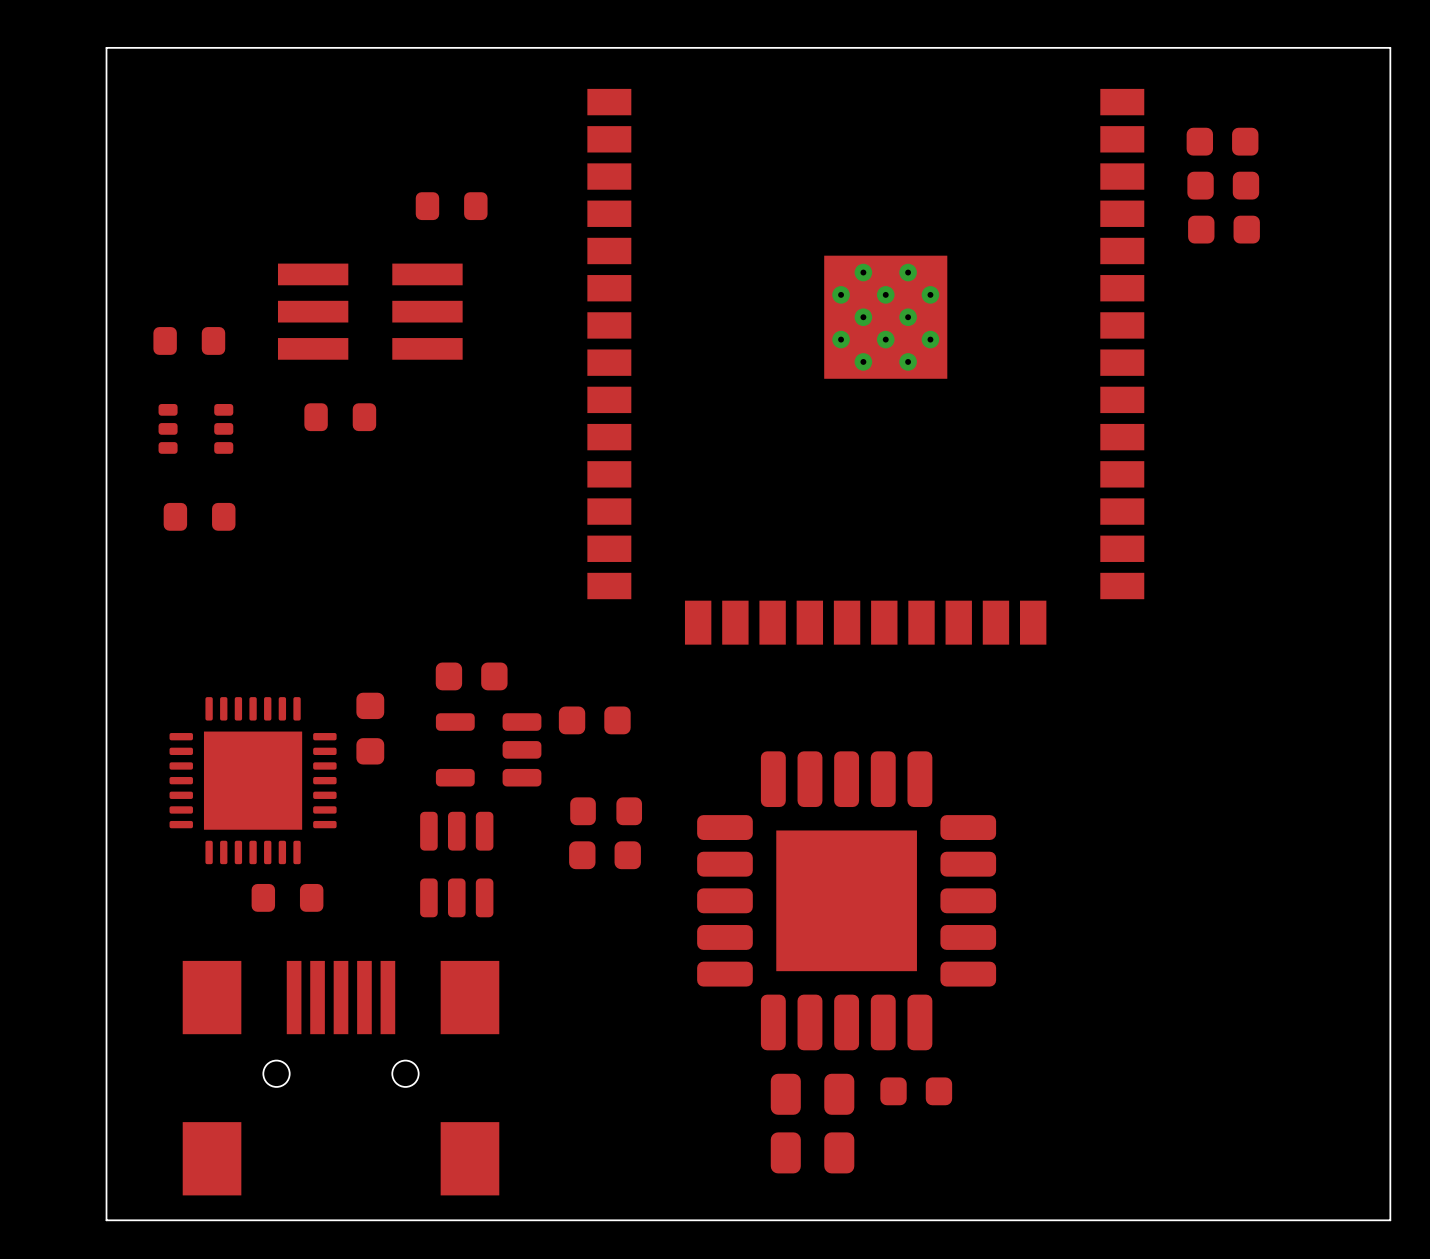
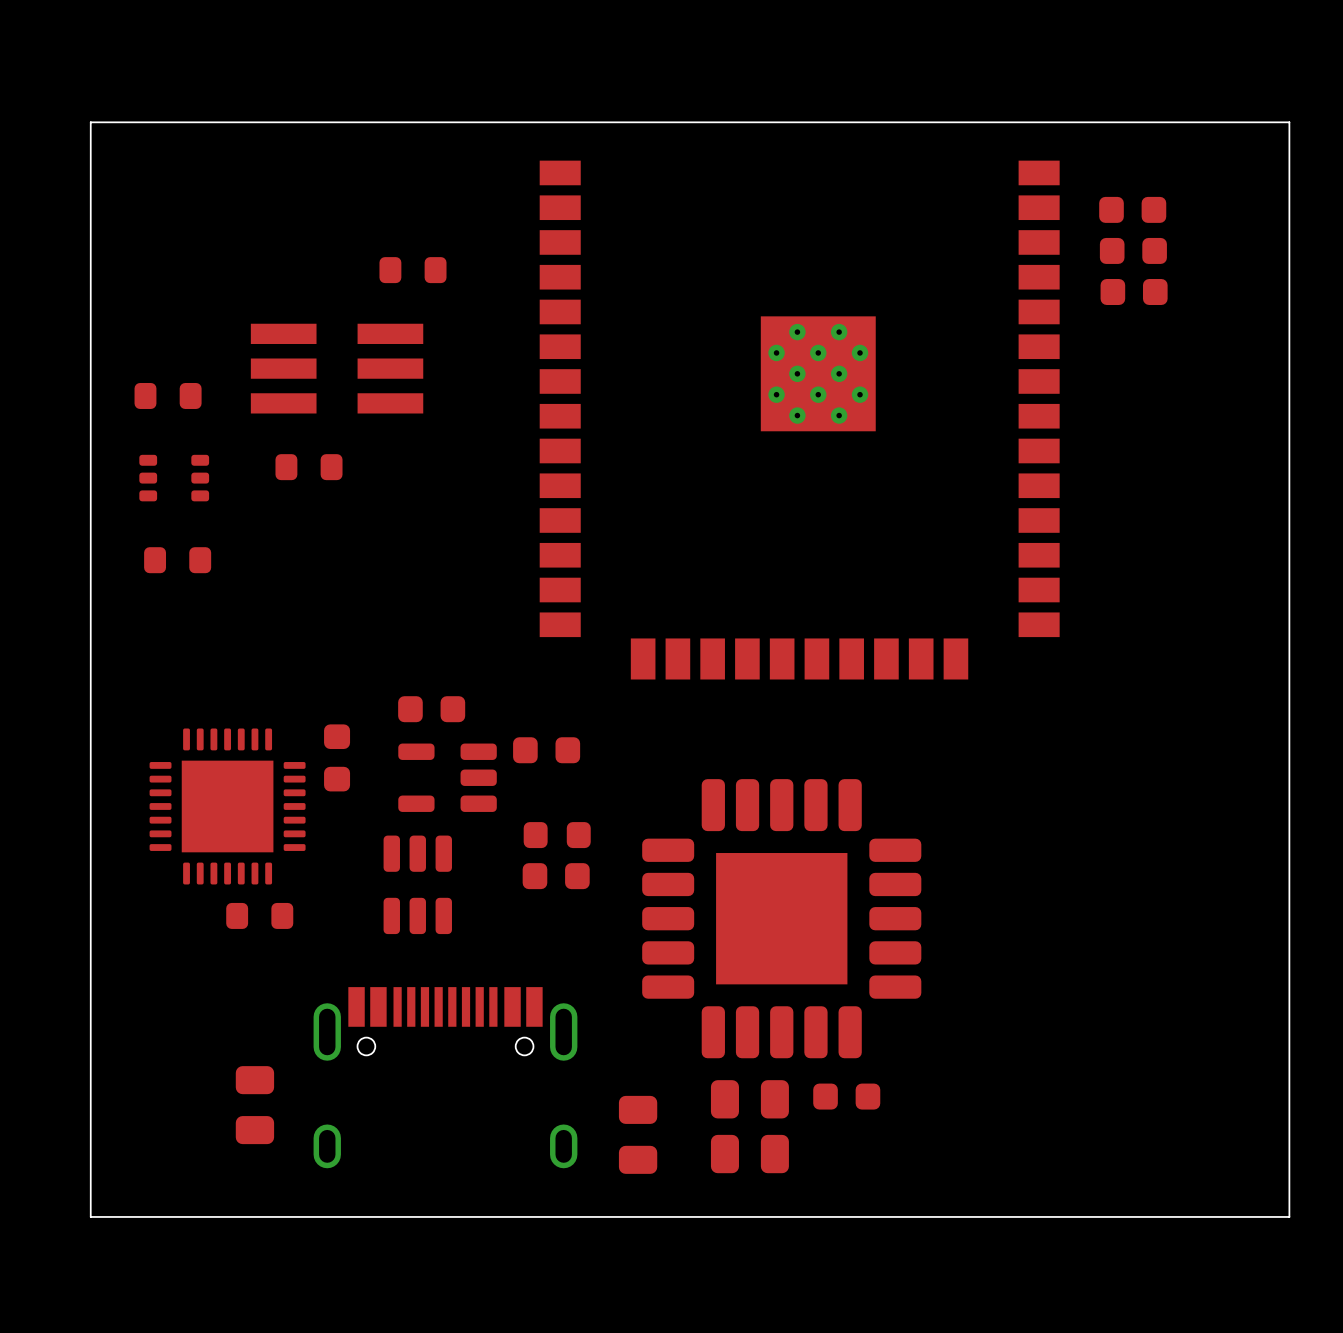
part: none -> (445, 1077)
part: (341, 1078) -> none
part: none -> (254, 1105)
part: none -> (638, 1134)

